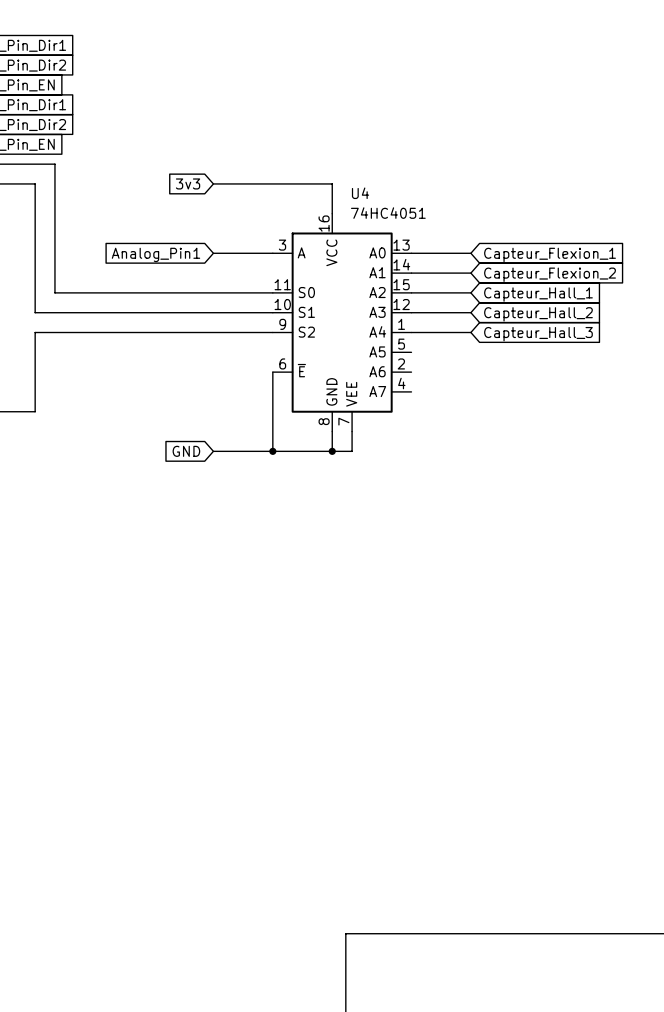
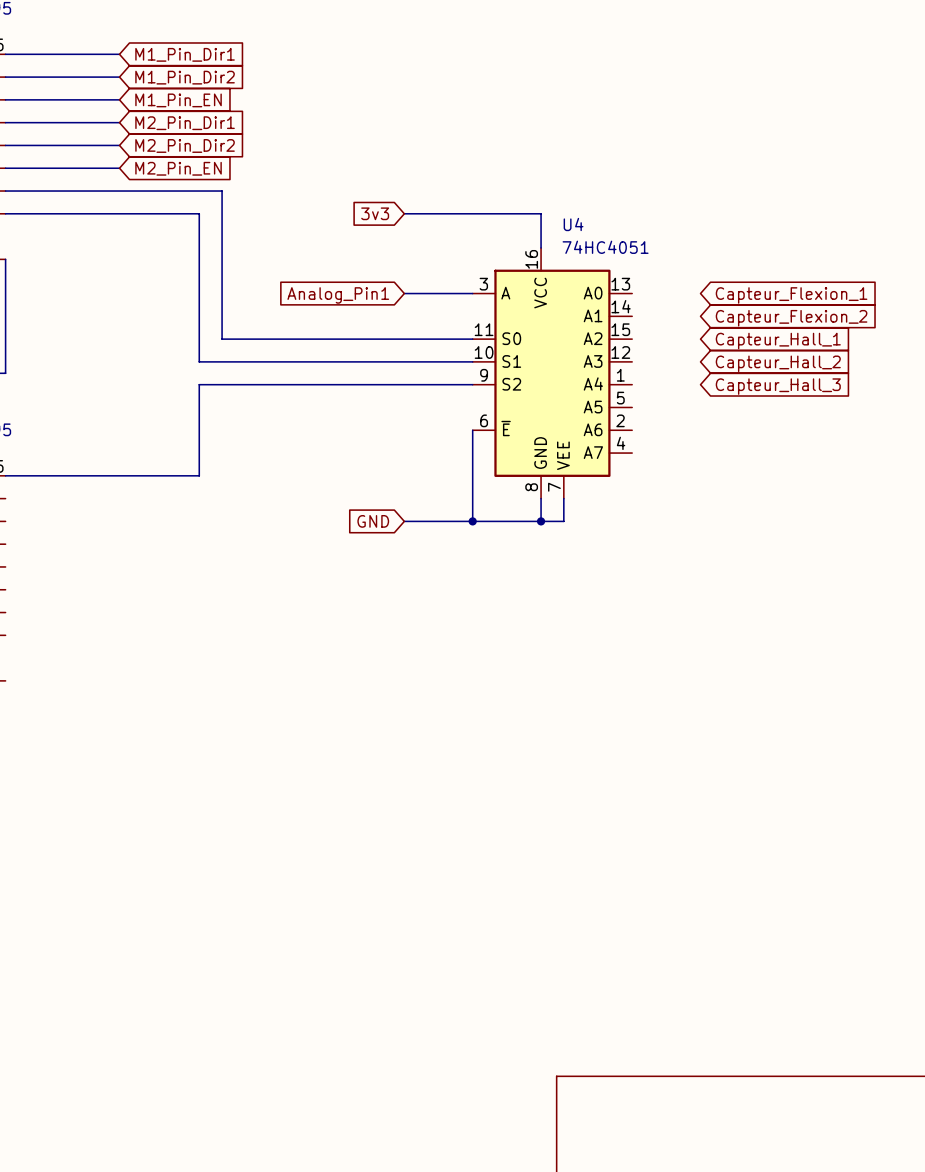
wire: (411, 253) (470, 253) -> none
wire: (411, 273) (470, 273) -> none
wire: (411, 292) (470, 292) -> none
wire: (411, 312) (470, 312) -> none
wire: (411, 332) (470, 332) -> none

